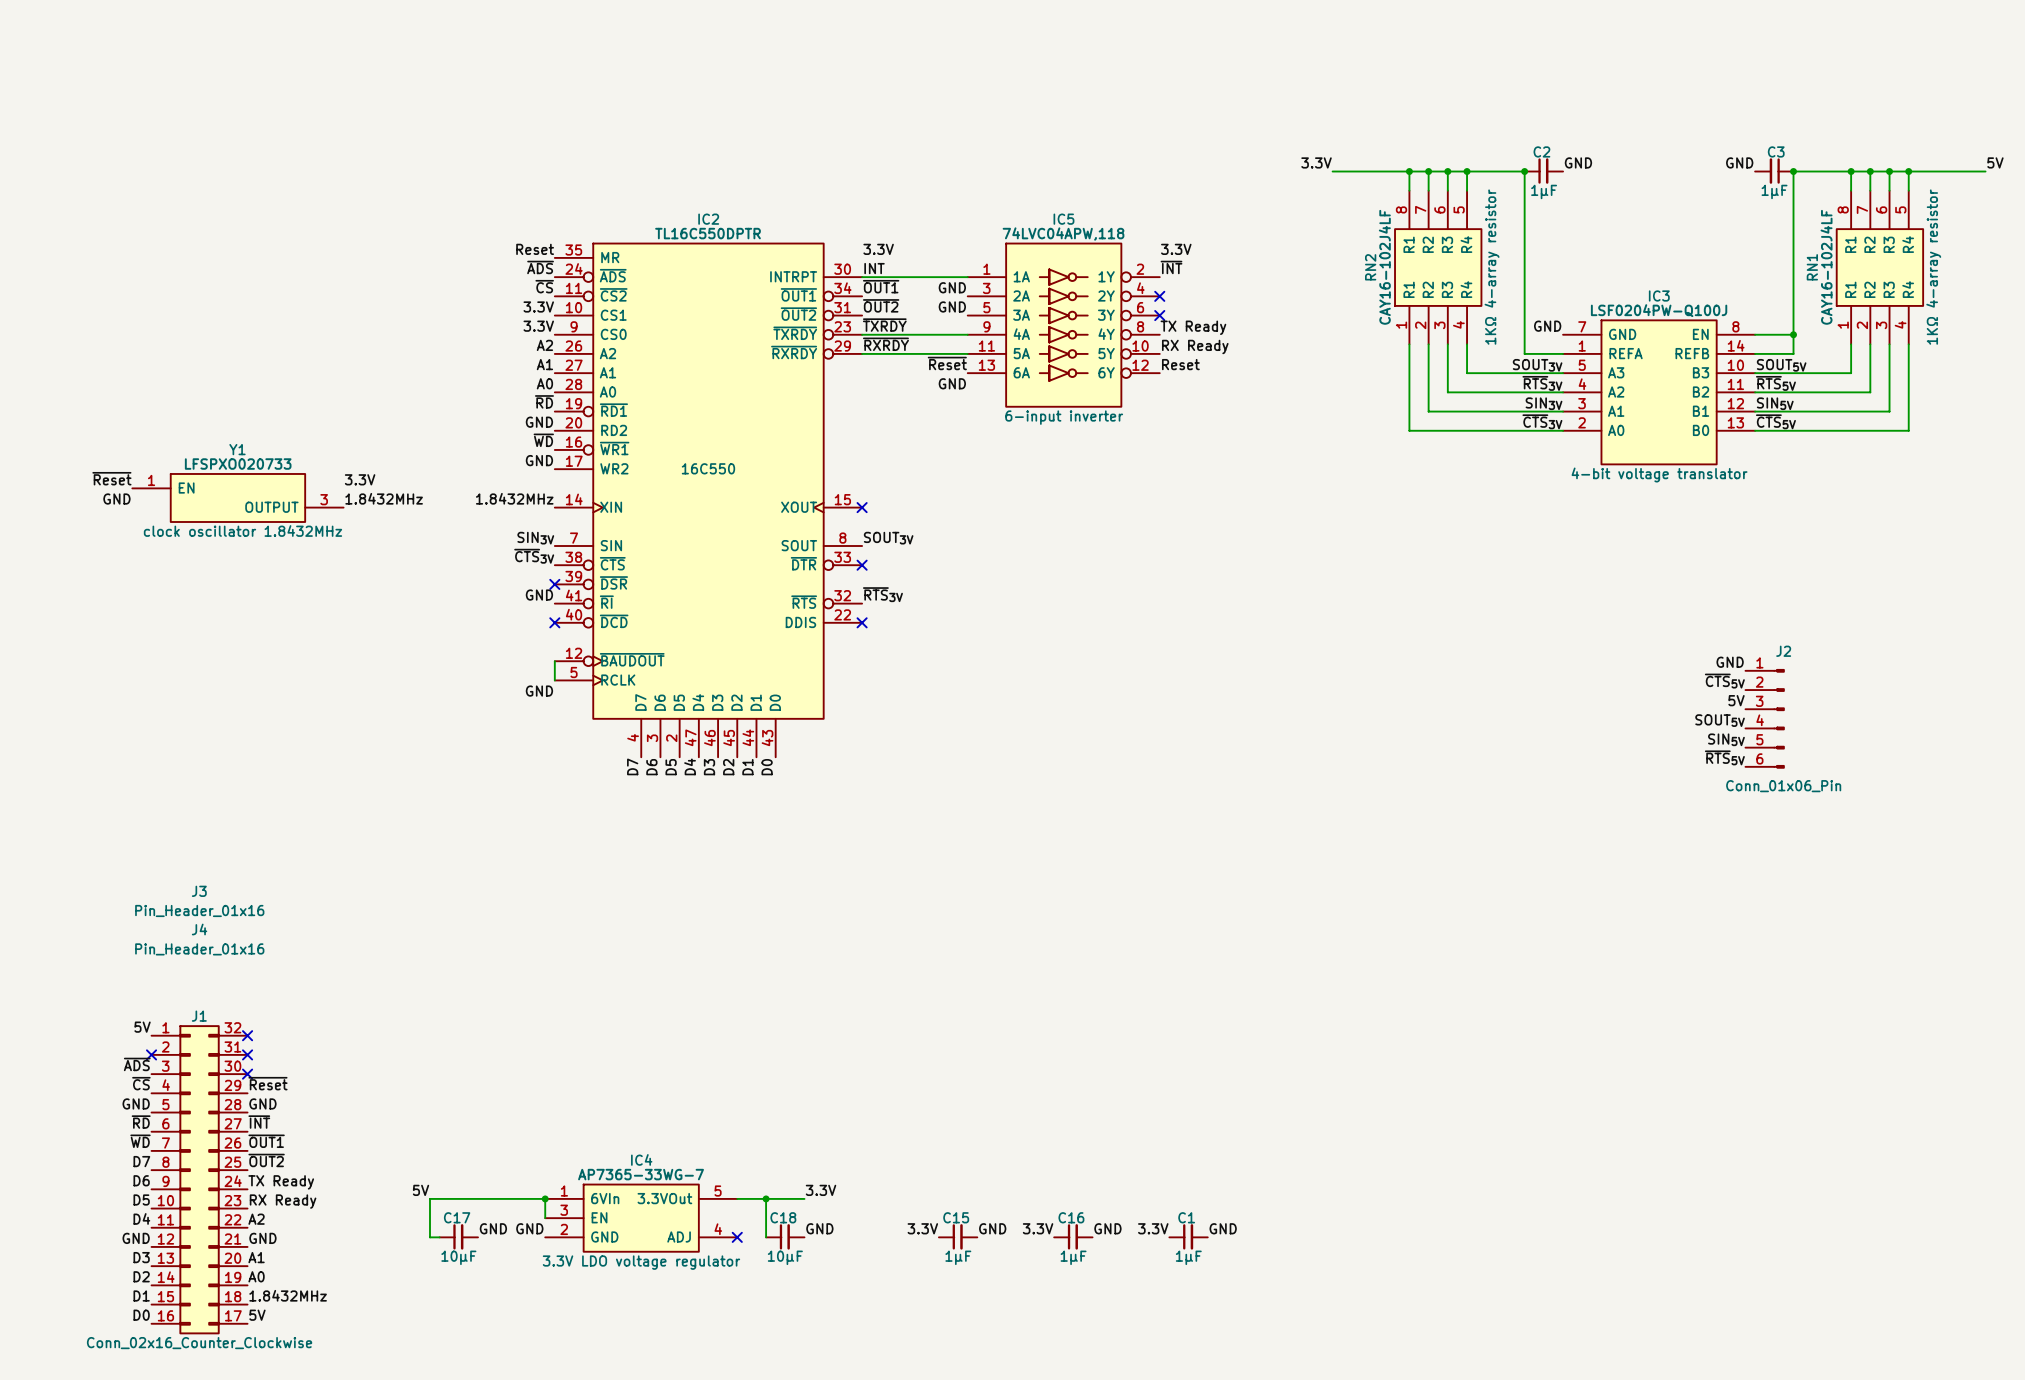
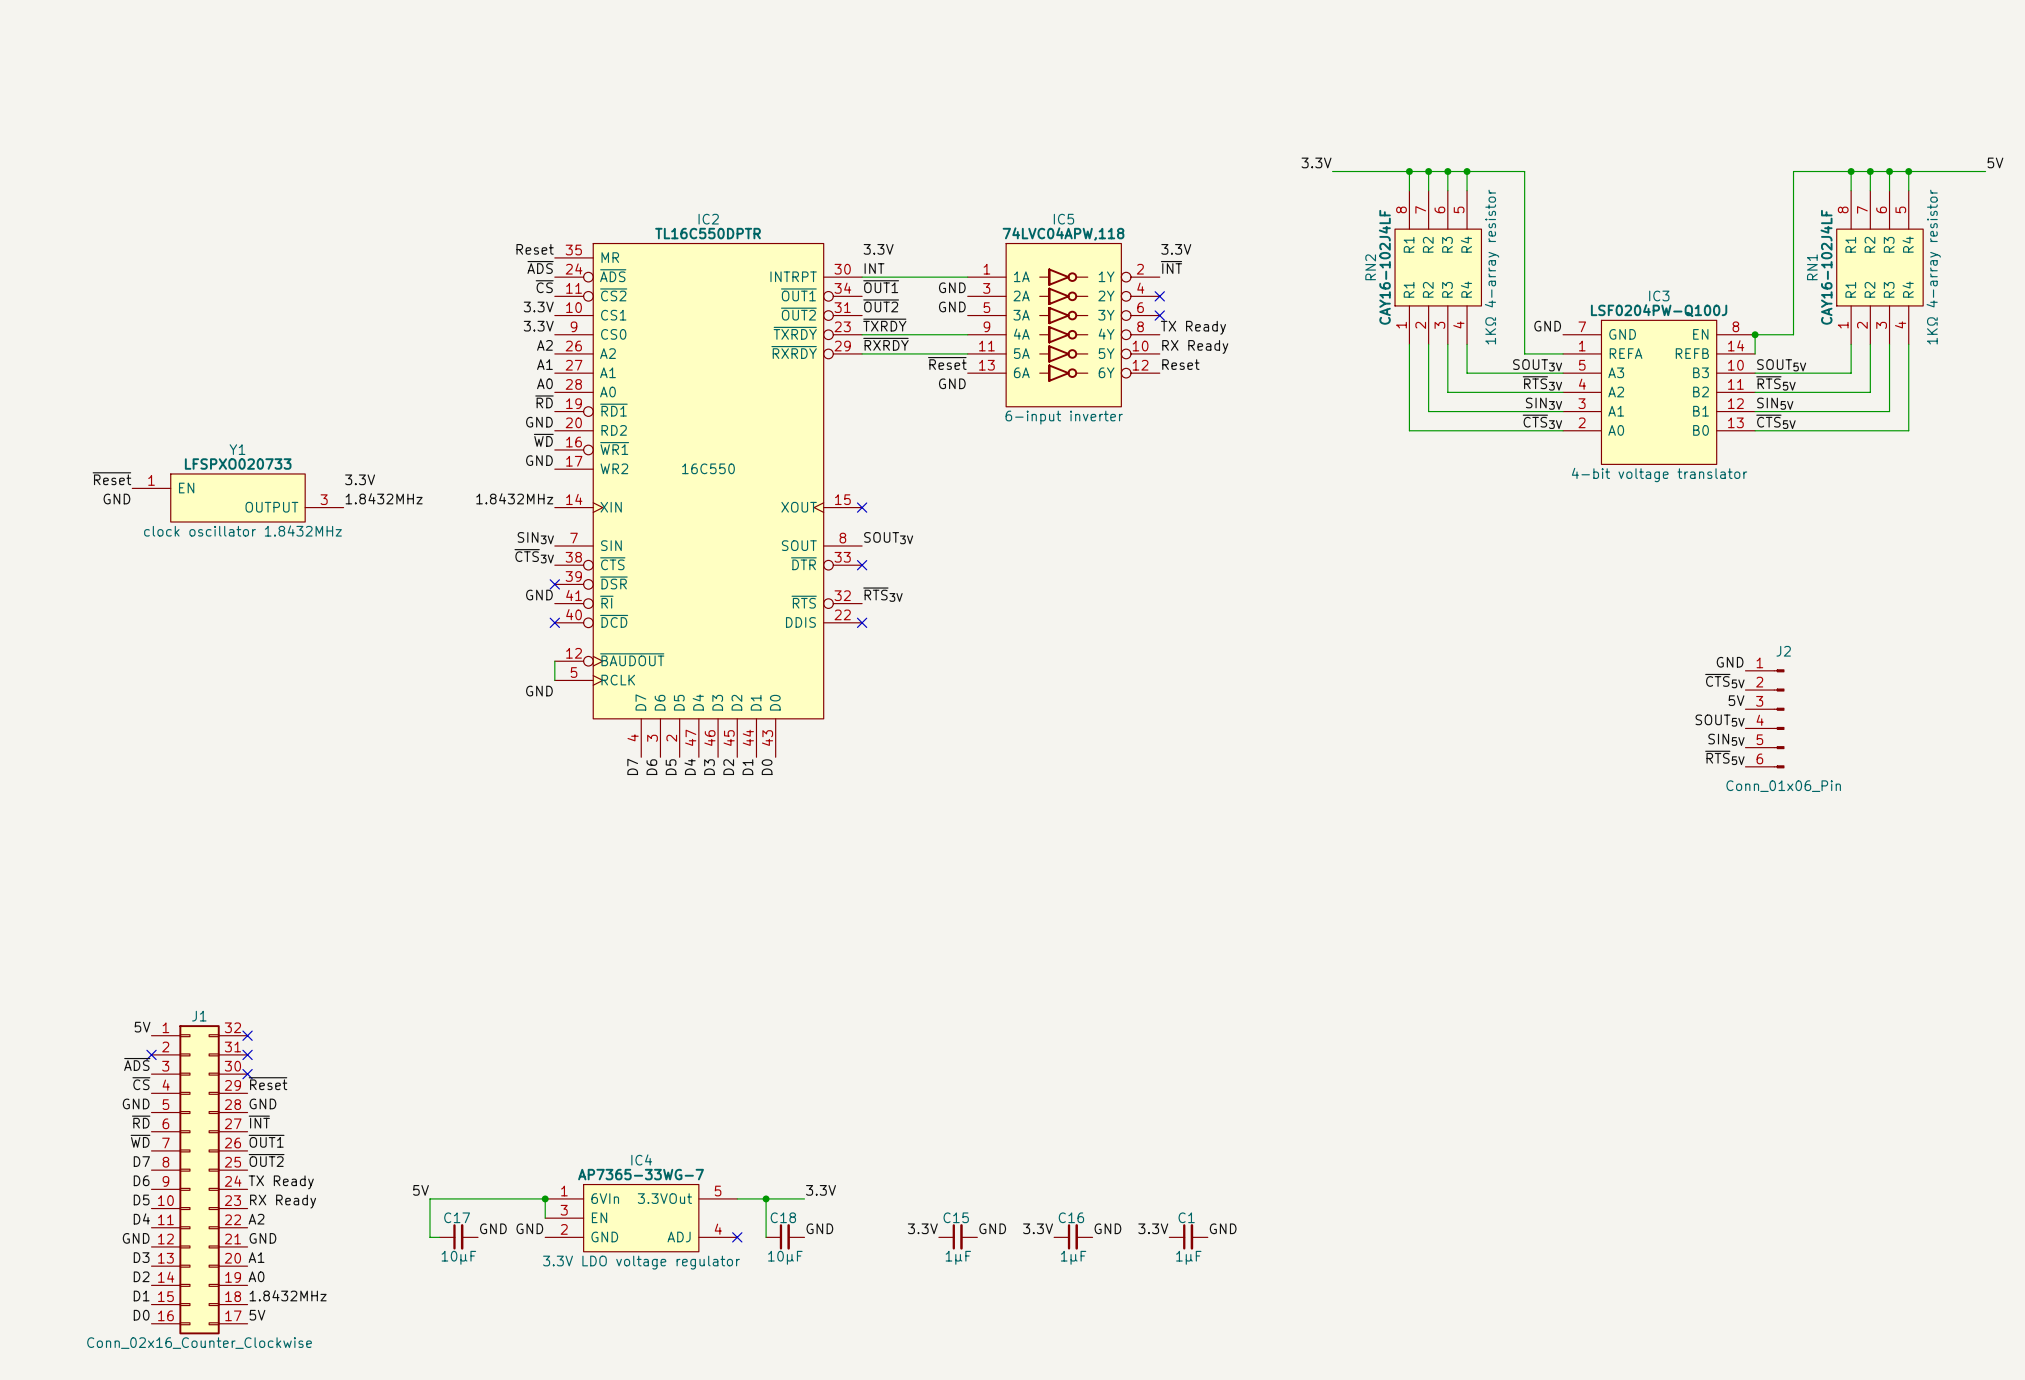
label: GND (1578, 162) -> none
label: GND (1739, 162) -> none
junction: (1524, 171) -> none
C2: 1μF (1543, 171) -> none
C3: 1μF (1774, 171) -> none
junction: (1793, 171) -> none
wire: (1793, 334) (1793, 353) (1755, 353) -> (1755, 334) (1755, 353)
junction position: (1793, 334) -> (1755, 334)
J3: Pin_Header_01x16 (199, 901) -> none
J4: Pin_Header_01x16 (199, 939) -> none

